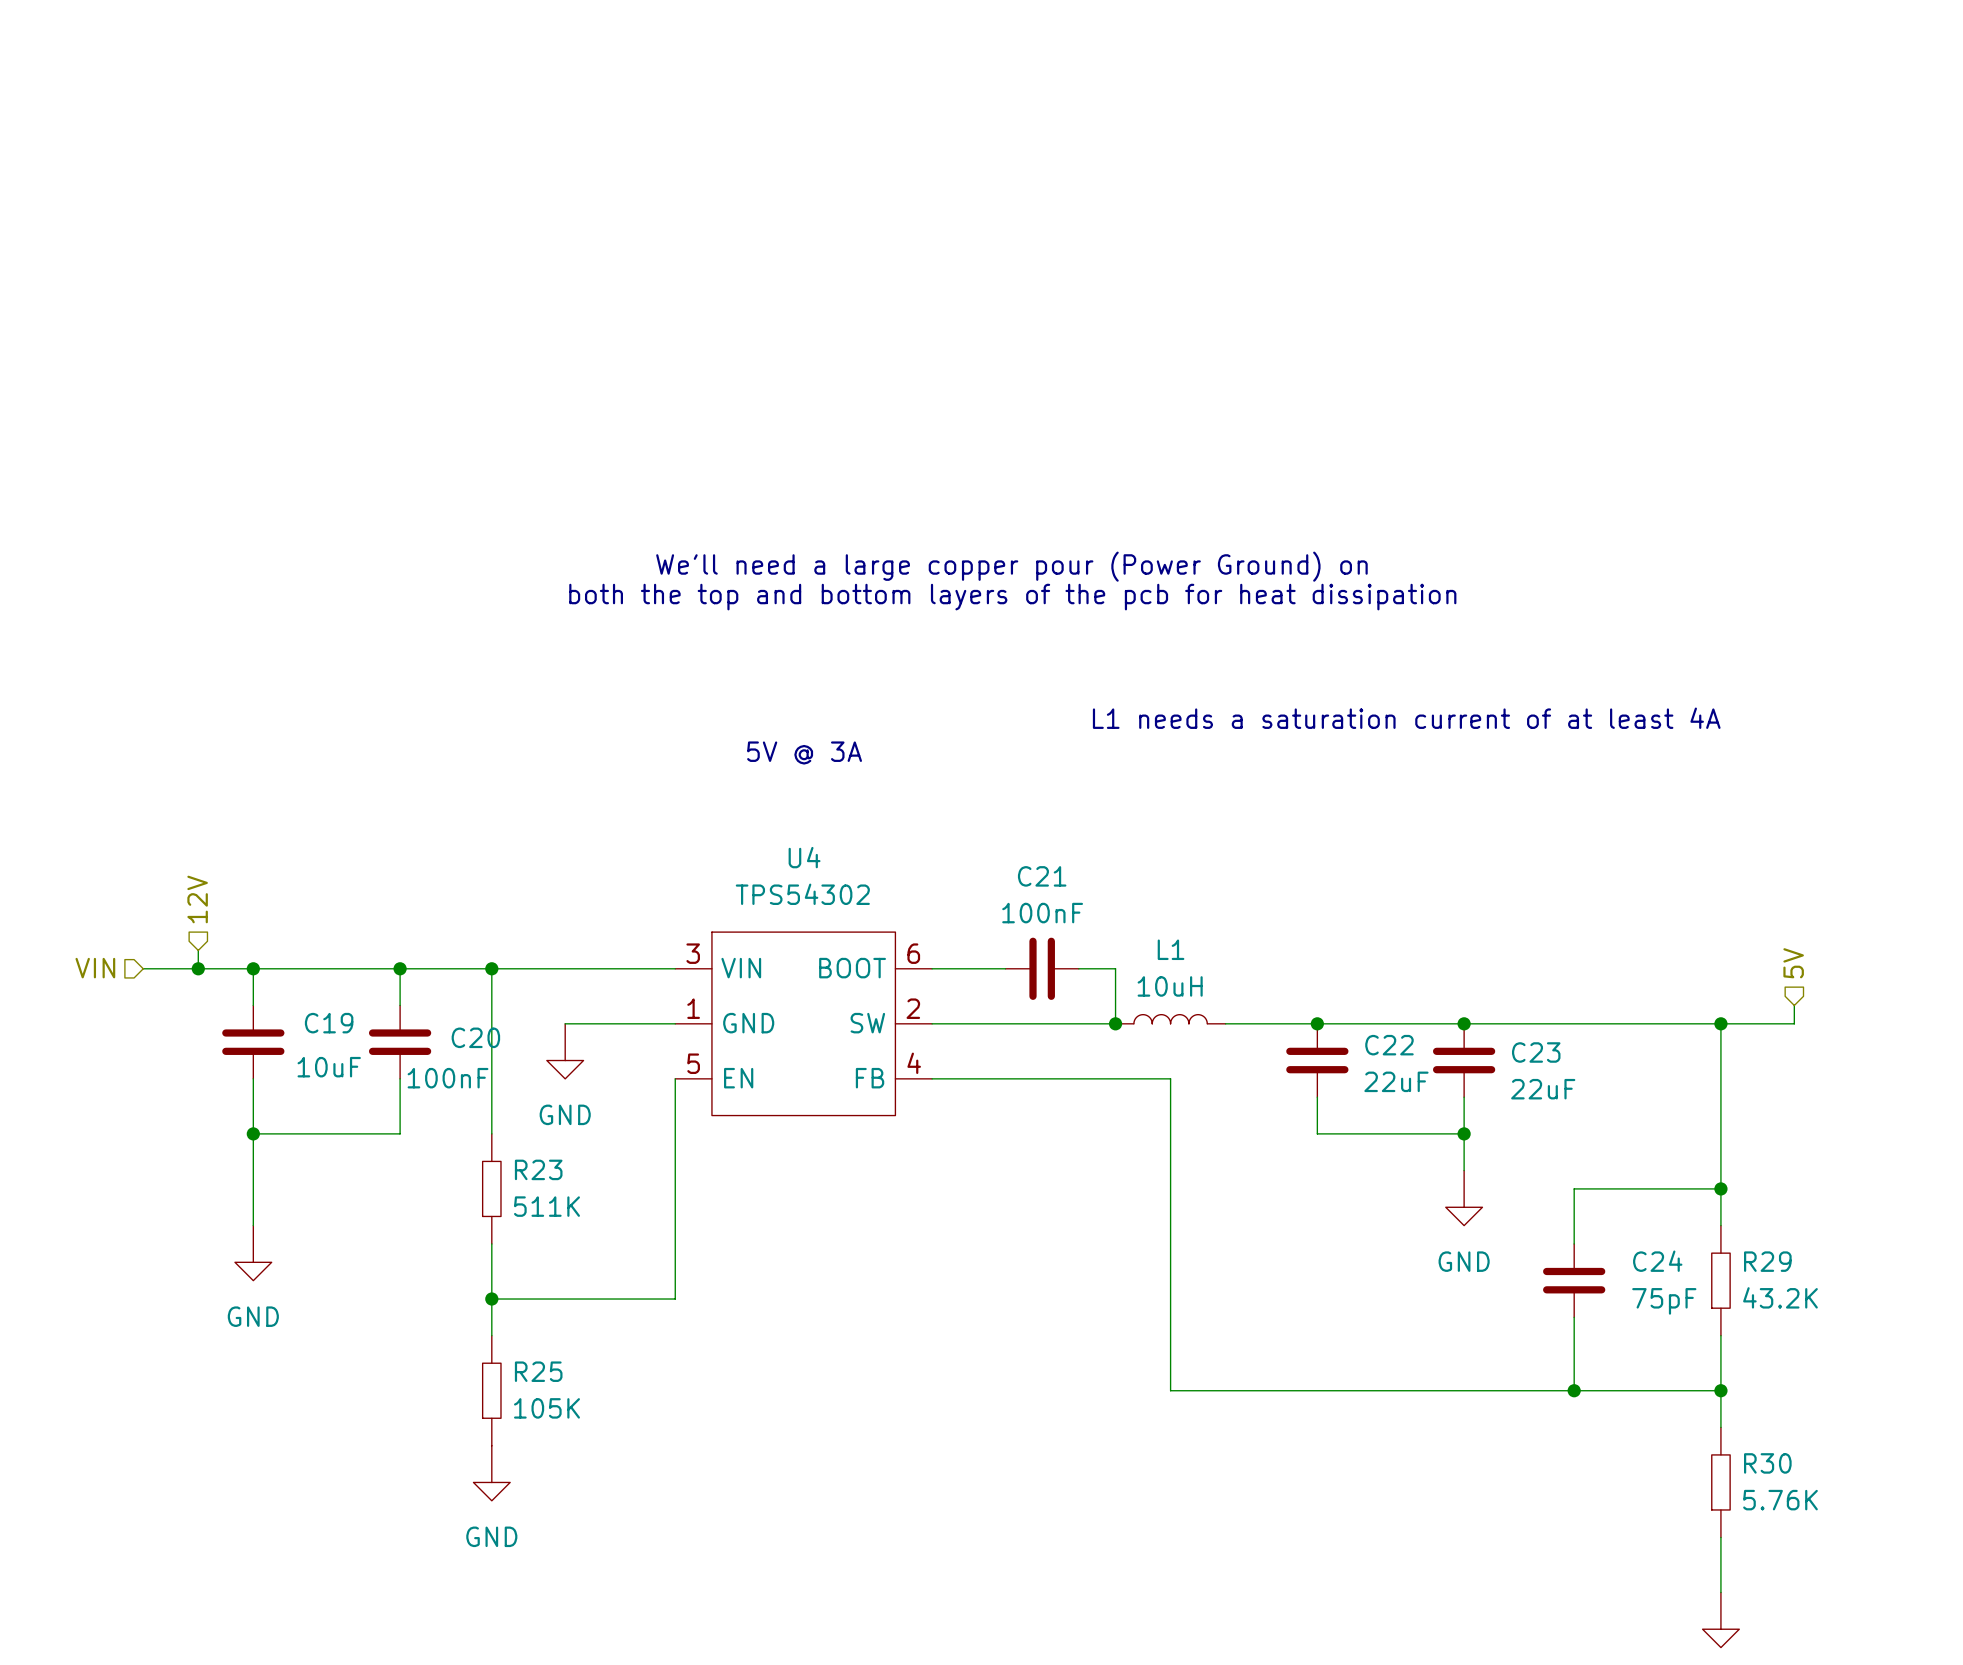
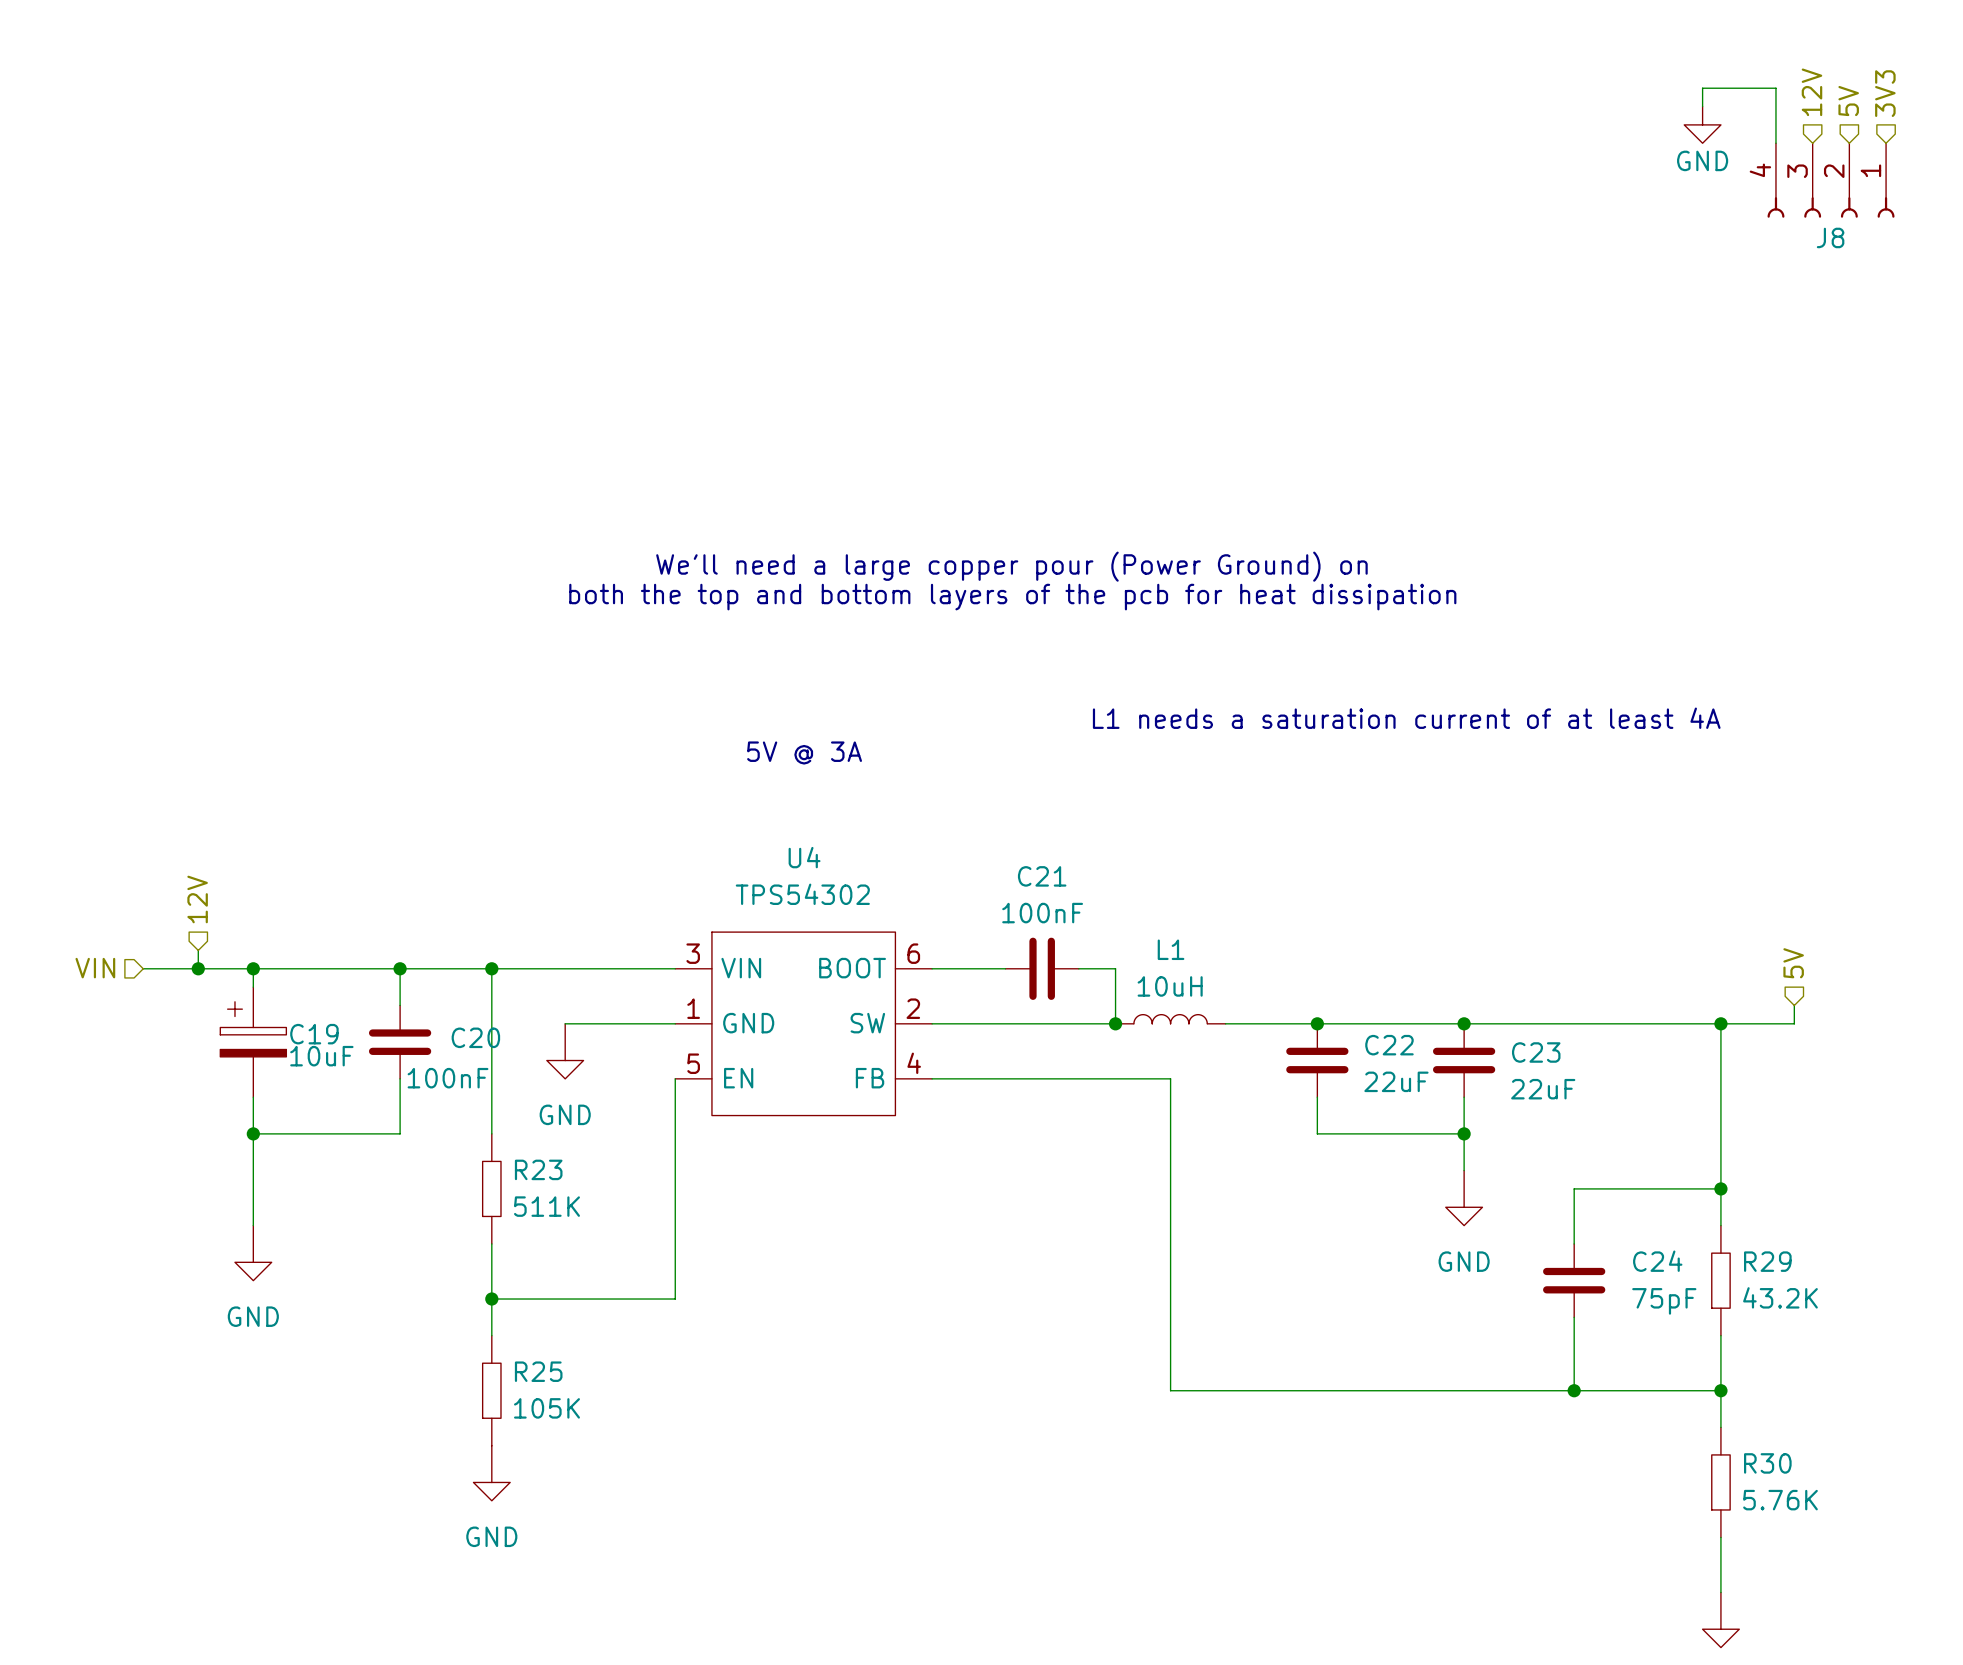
hierarchical label: none -> 12V (1811, 92)
hierarchical label: none -> 3V3 (1885, 93)
hierarchical label: none -> 5V (1848, 101)
wire: none -> (1702, 106) (1702, 88) (1775, 88) (1775, 143)
power symbol: none -> GND (1702, 124)
J8: none -> (1831, 180)
C19 symbol: [222, 1005, 285, 1079] -> [220, 987, 287, 1098]

